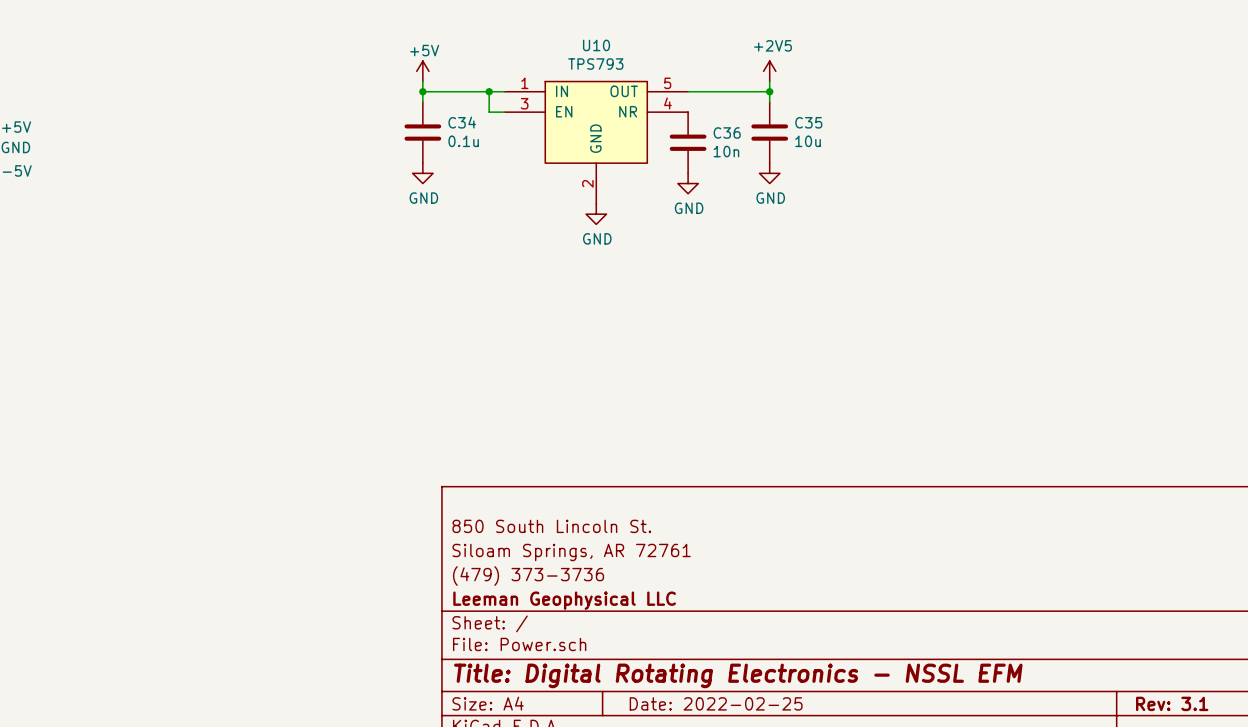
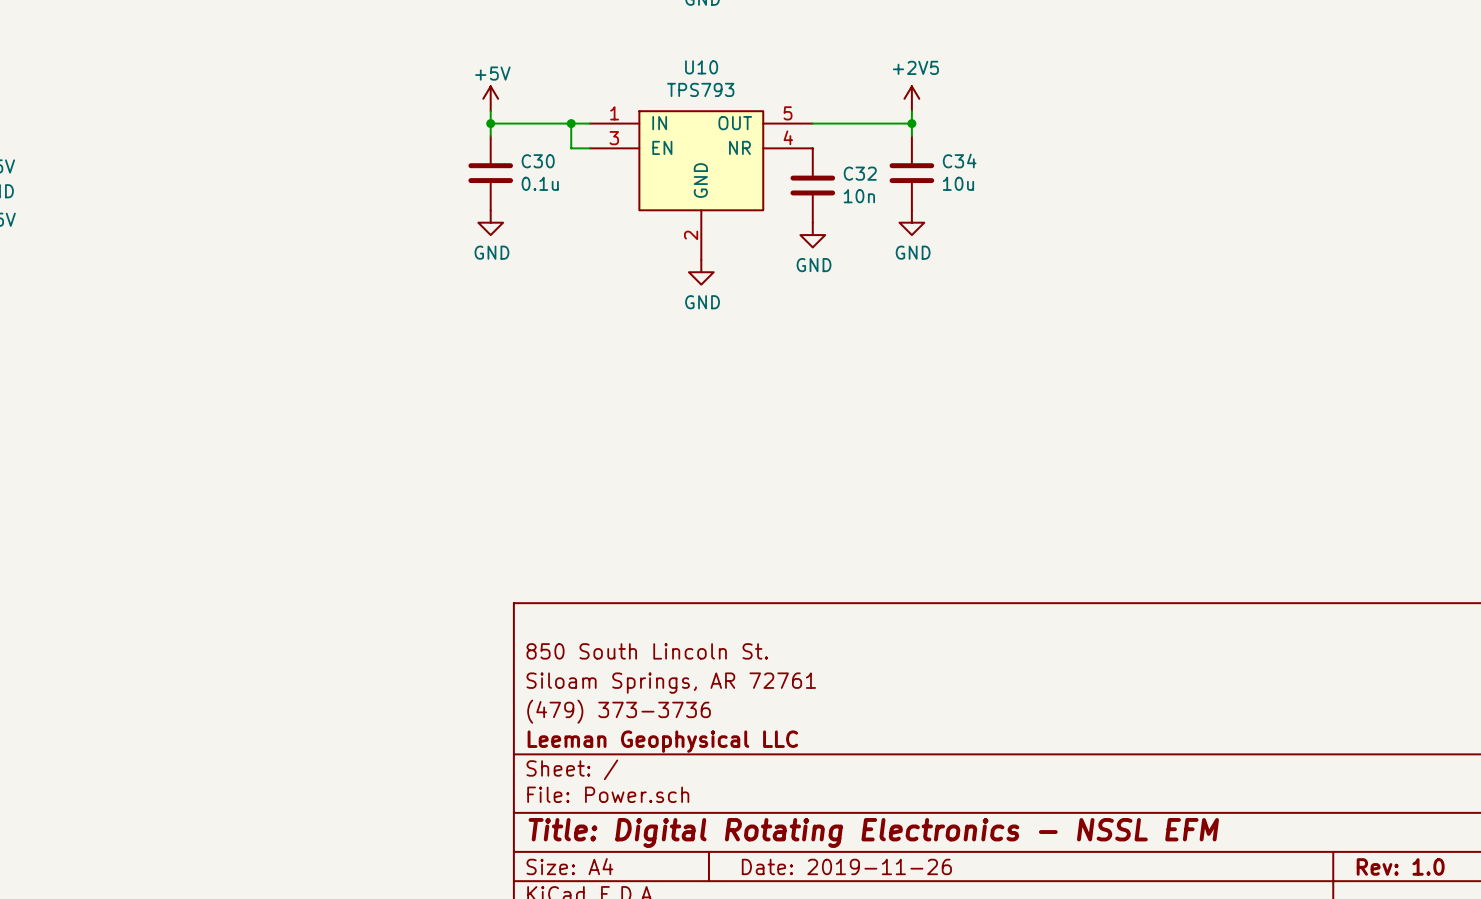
C34 name: C34 (462, 122) -> C30 (538, 161)
C35 name: C35 (808, 122) -> C34 (959, 160)
C36 name: C36 (727, 132) -> C32 (860, 173)
title block: Date: 2022-02-25 (716, 703) -> Date: 2019-11-26 (846, 866)
title block: Rev: 3.1 (1172, 703) -> Rev: 1.0 (1400, 866)

